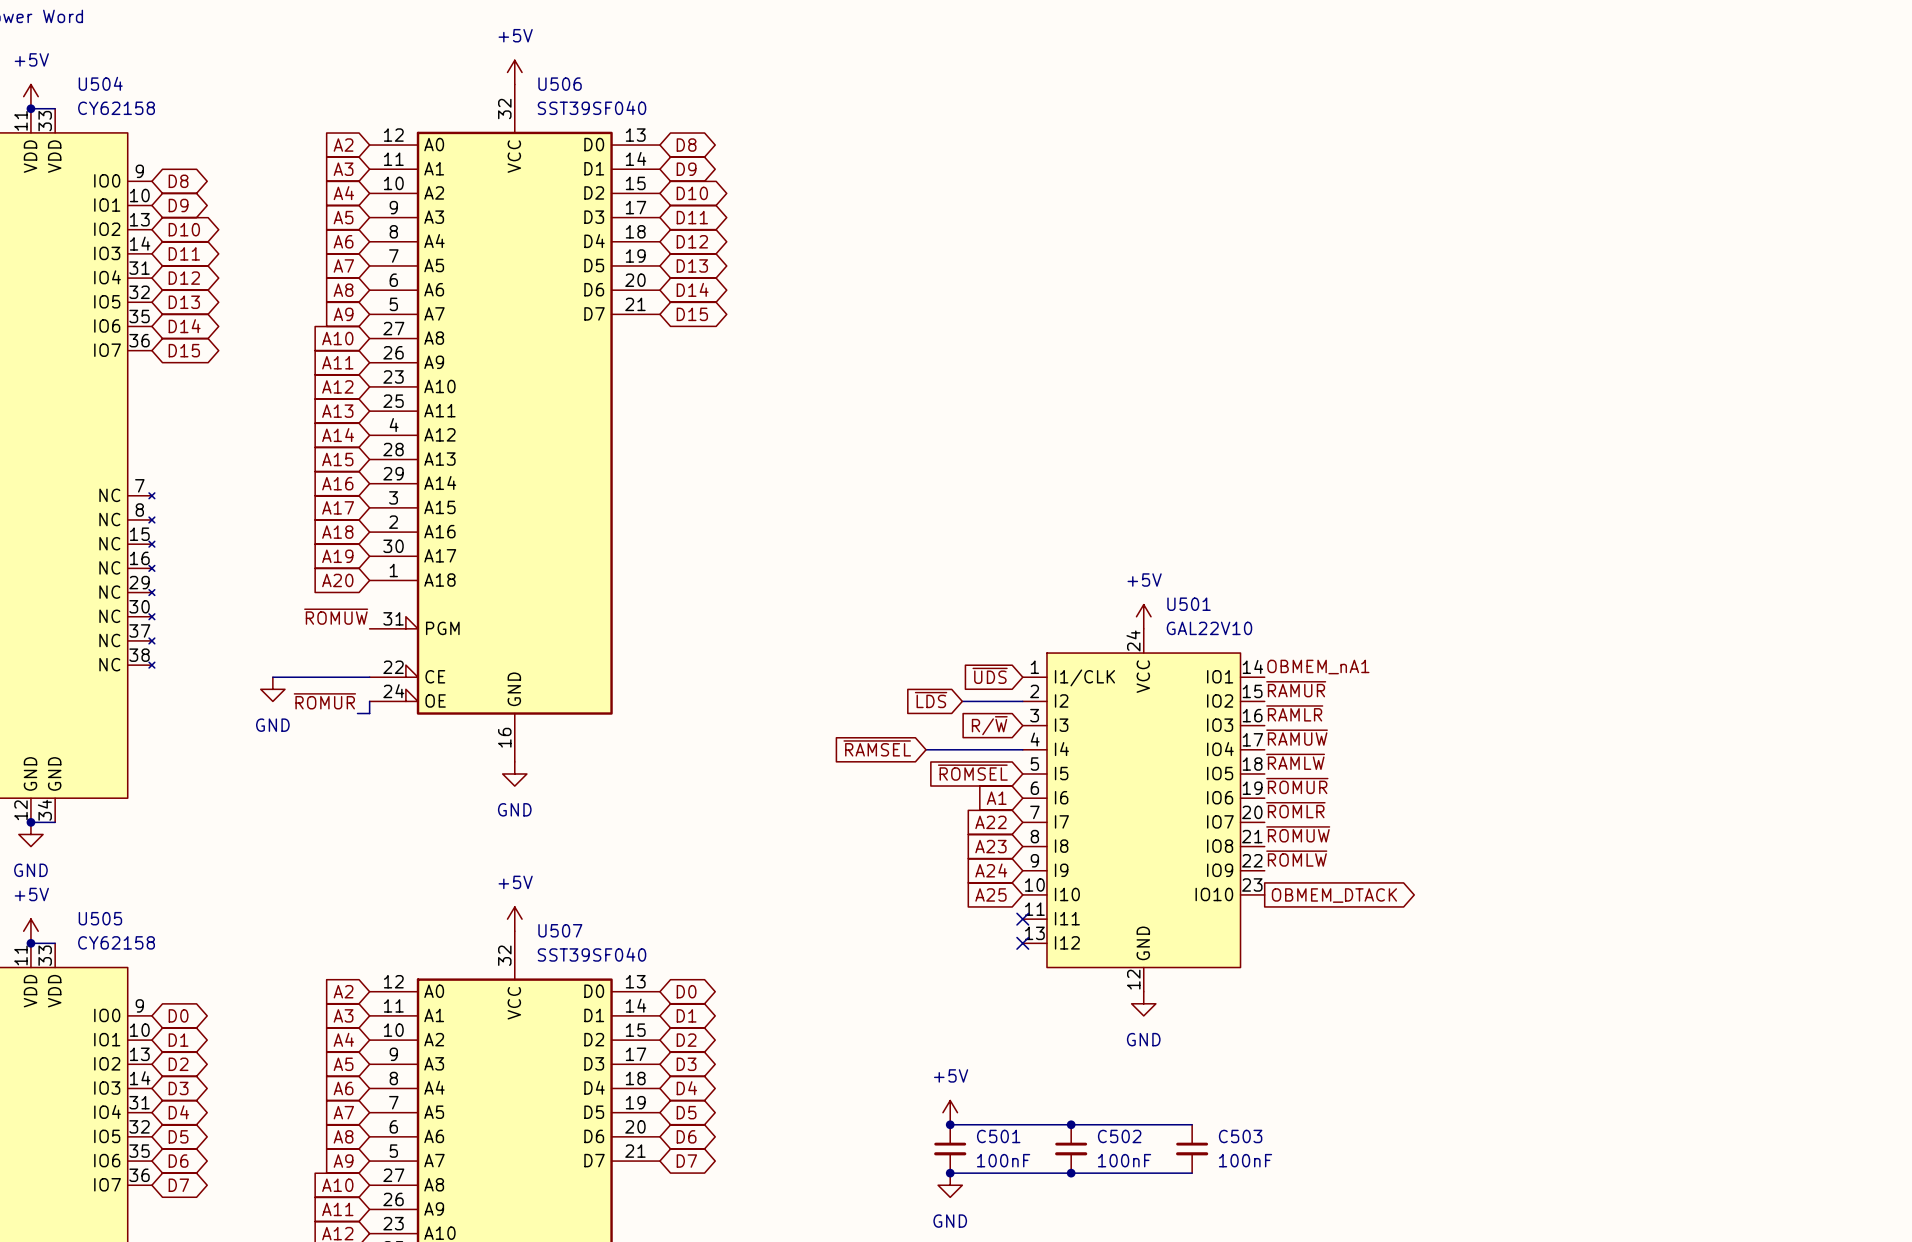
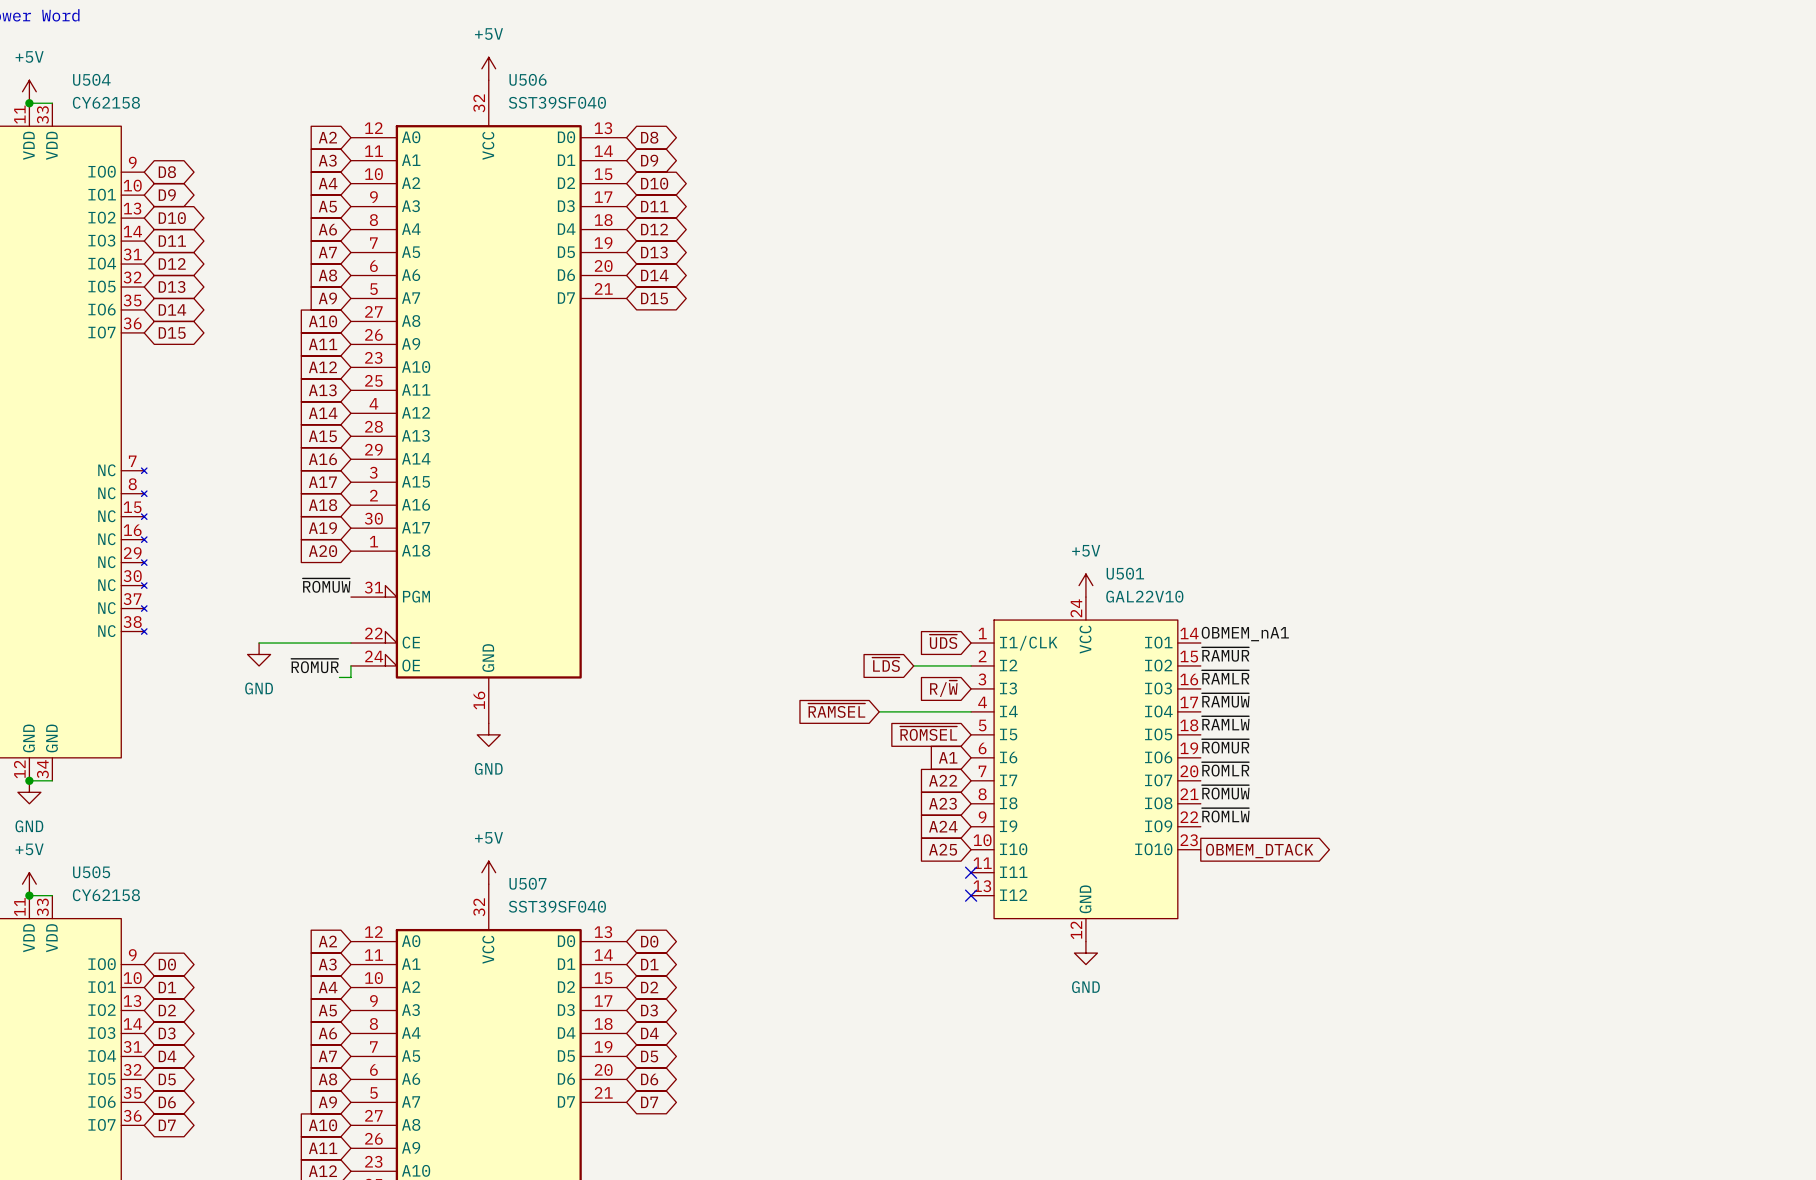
power symbol: +5V (950, 1112) -> none
wire: (950, 1124) (1192, 1124) -> none
junction: (950, 1124) -> none
junction: (1071, 1124) -> none
C501: 100nF (950, 1148) -> none
C502: 100nF (1071, 1148) -> none
C503: 100nF (1192, 1148) -> none
wire: (950, 1173) (1192, 1173) -> none
junction: (950, 1173) -> none
junction: (1071, 1173) -> none
power symbol: GND (950, 1185) -> none

